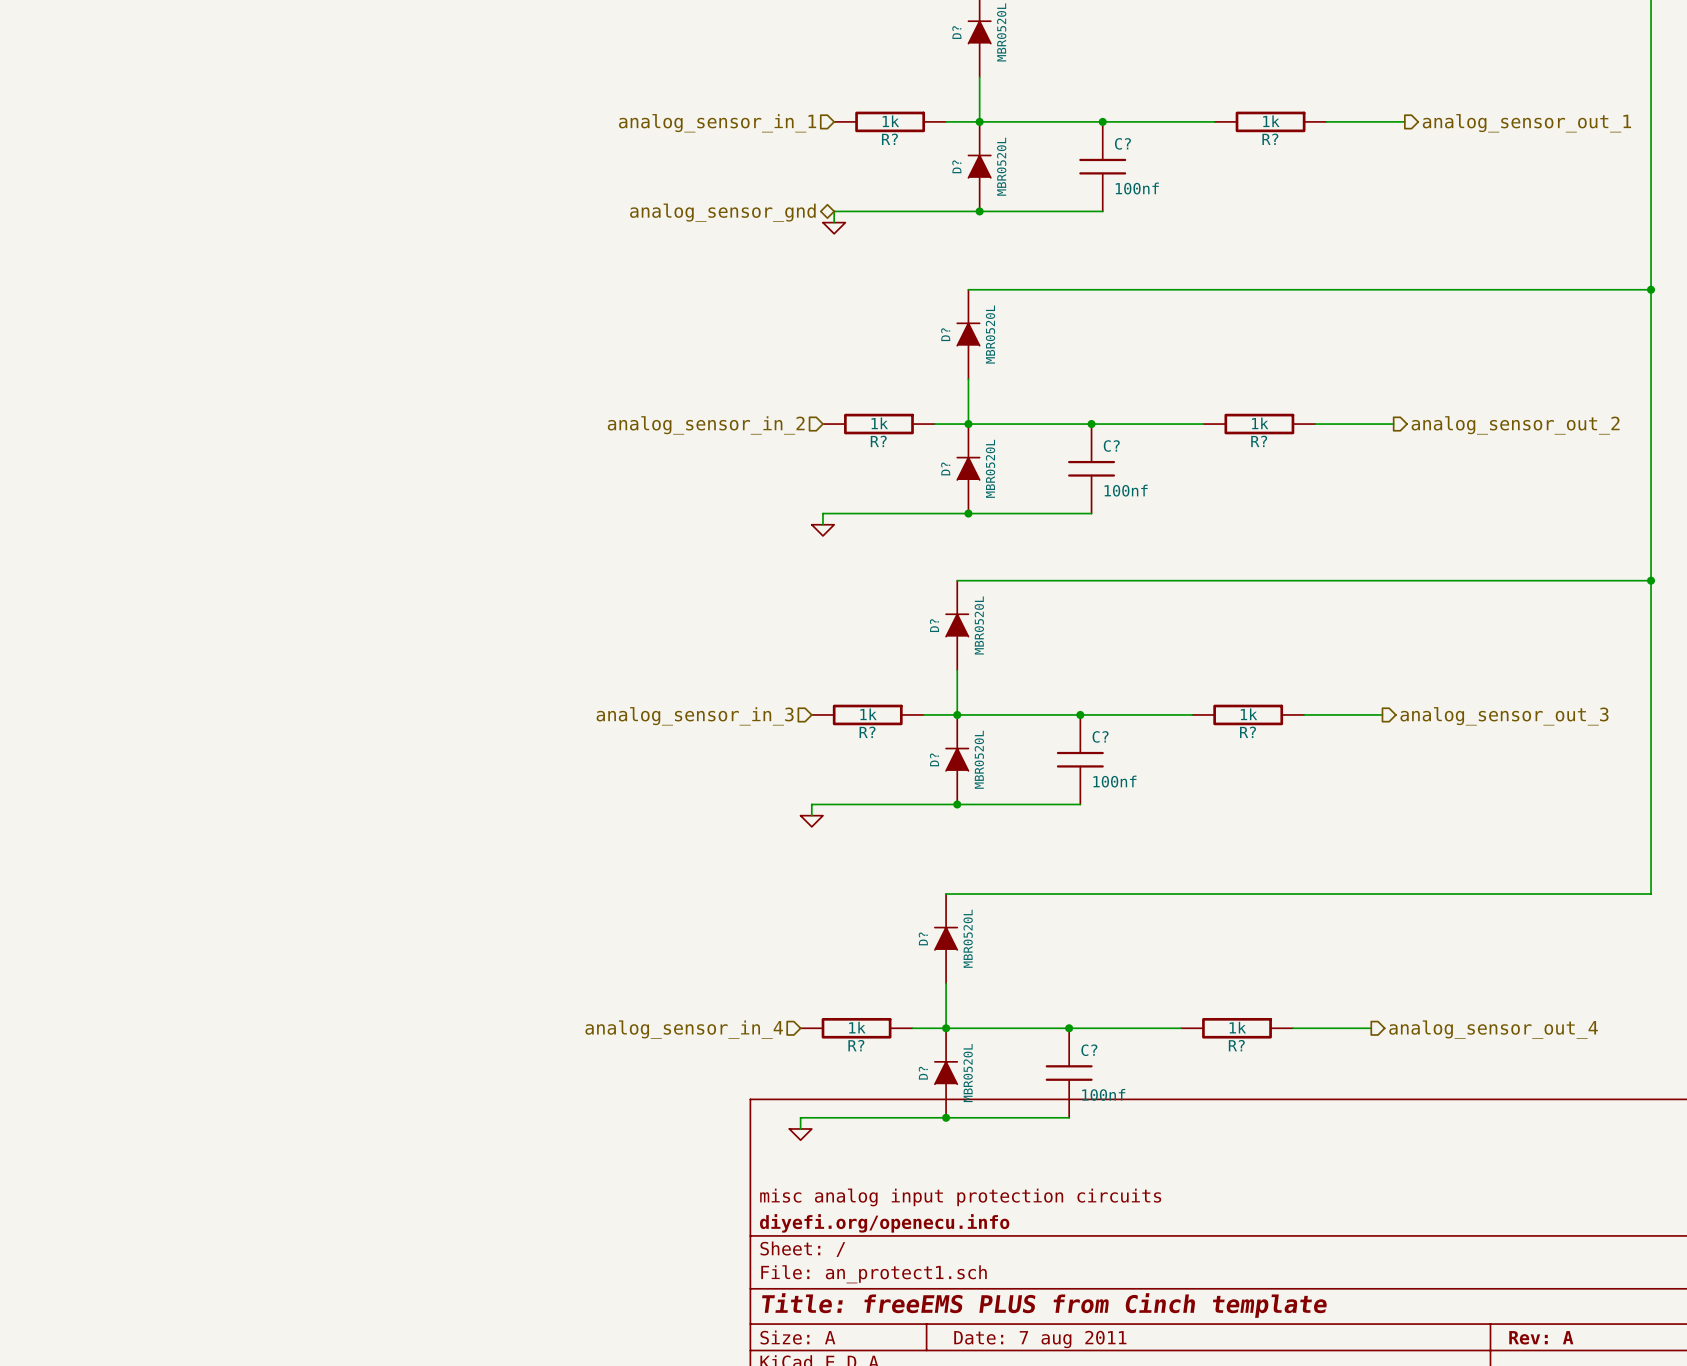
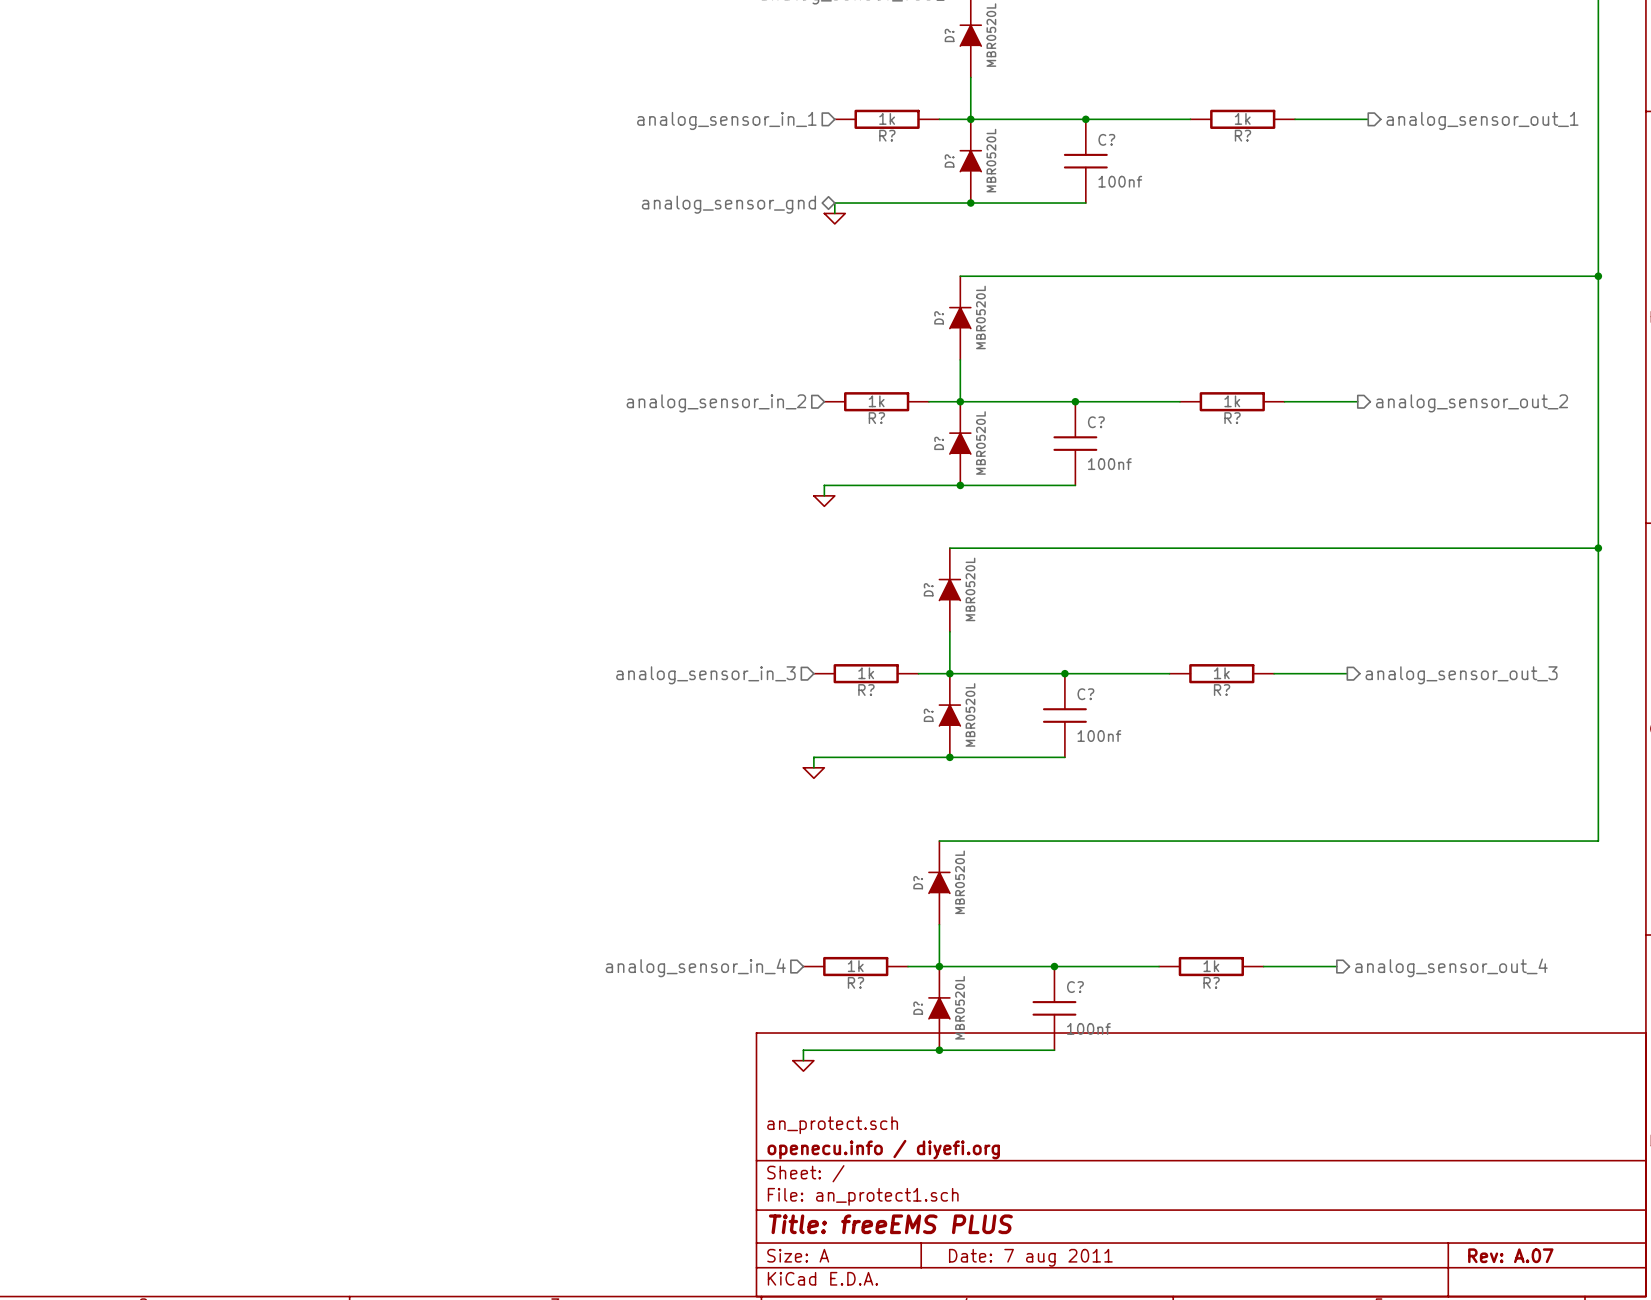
title block: misc analog input protection circuits (960, 1197) -> an_protect.sch (832, 1125)
title block: diyefi.org/openecu.info (884, 1223) -> openecu.info / diyefi.org (883, 1149)
title block: Title: freeEMS PLUS from Cinch template (1044, 1305) -> Title: freeEMS PLUS (890, 1224)
title block: Rev: A (1541, 1337) -> Rev: A.07 (1510, 1255)

